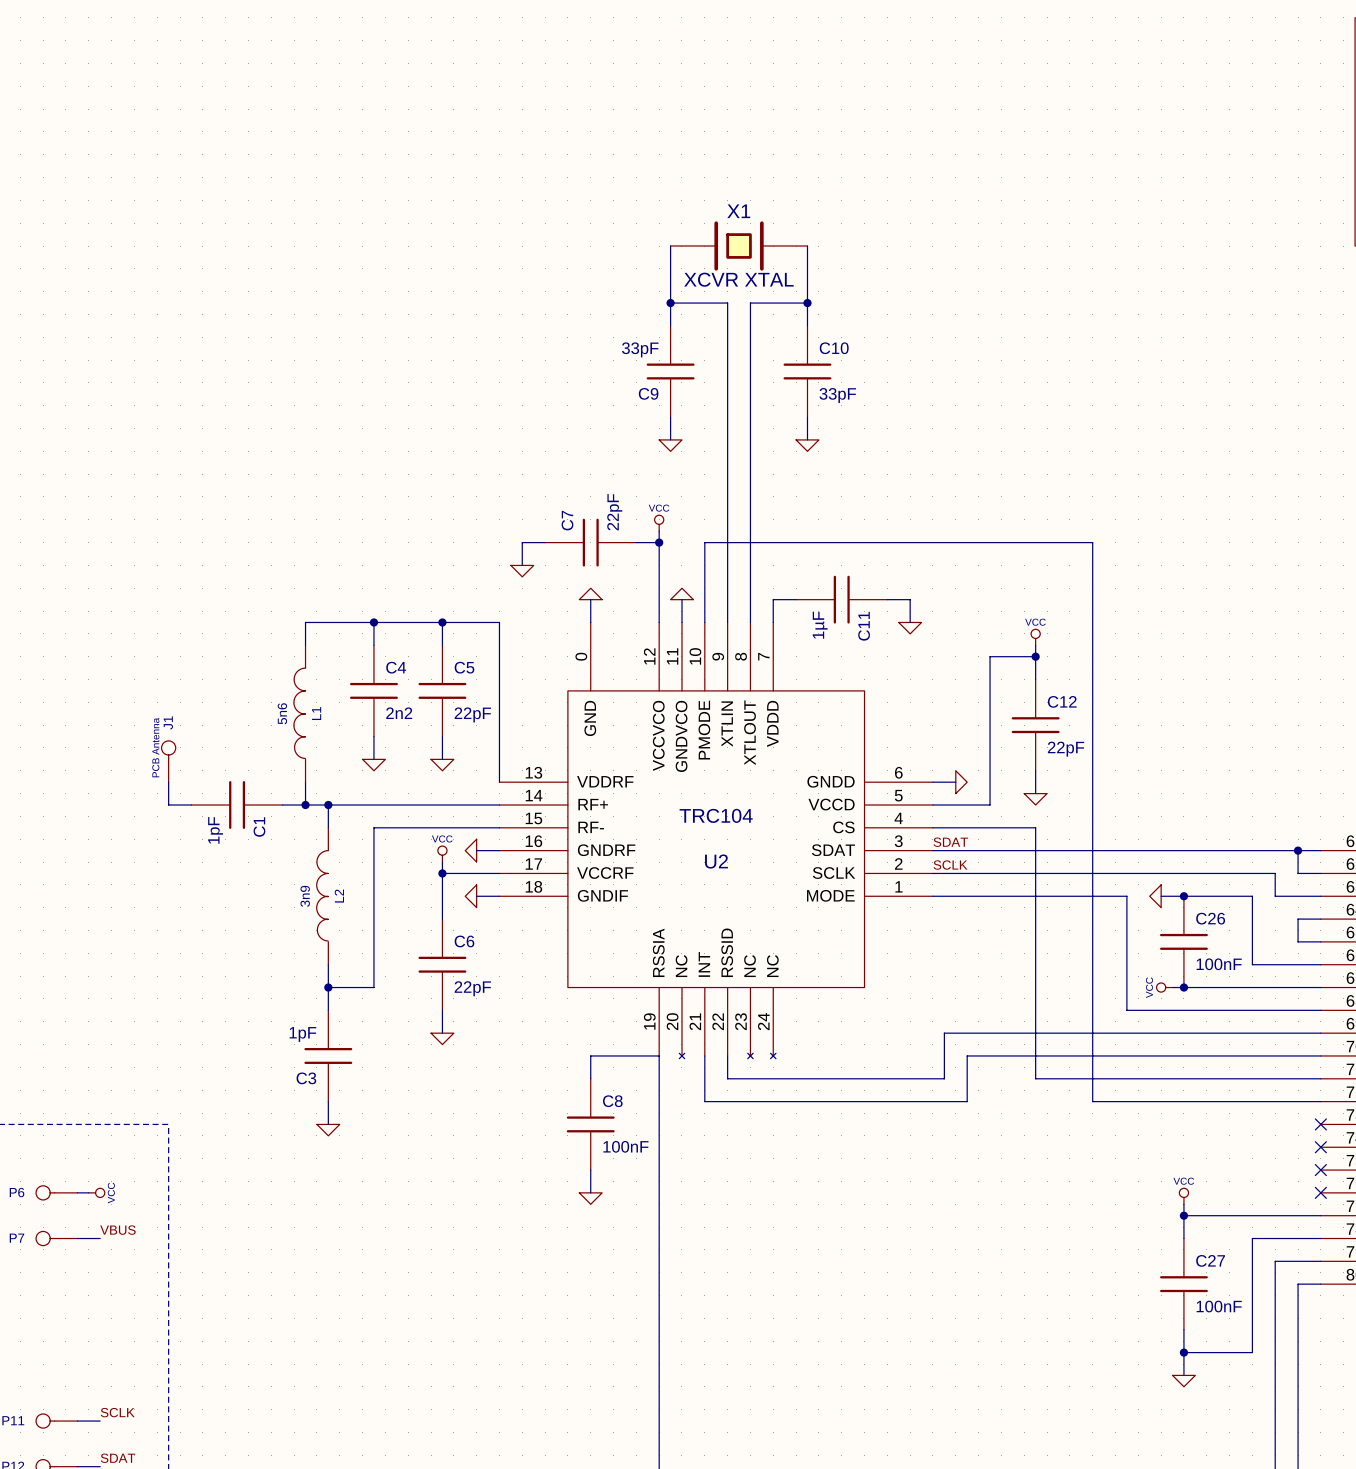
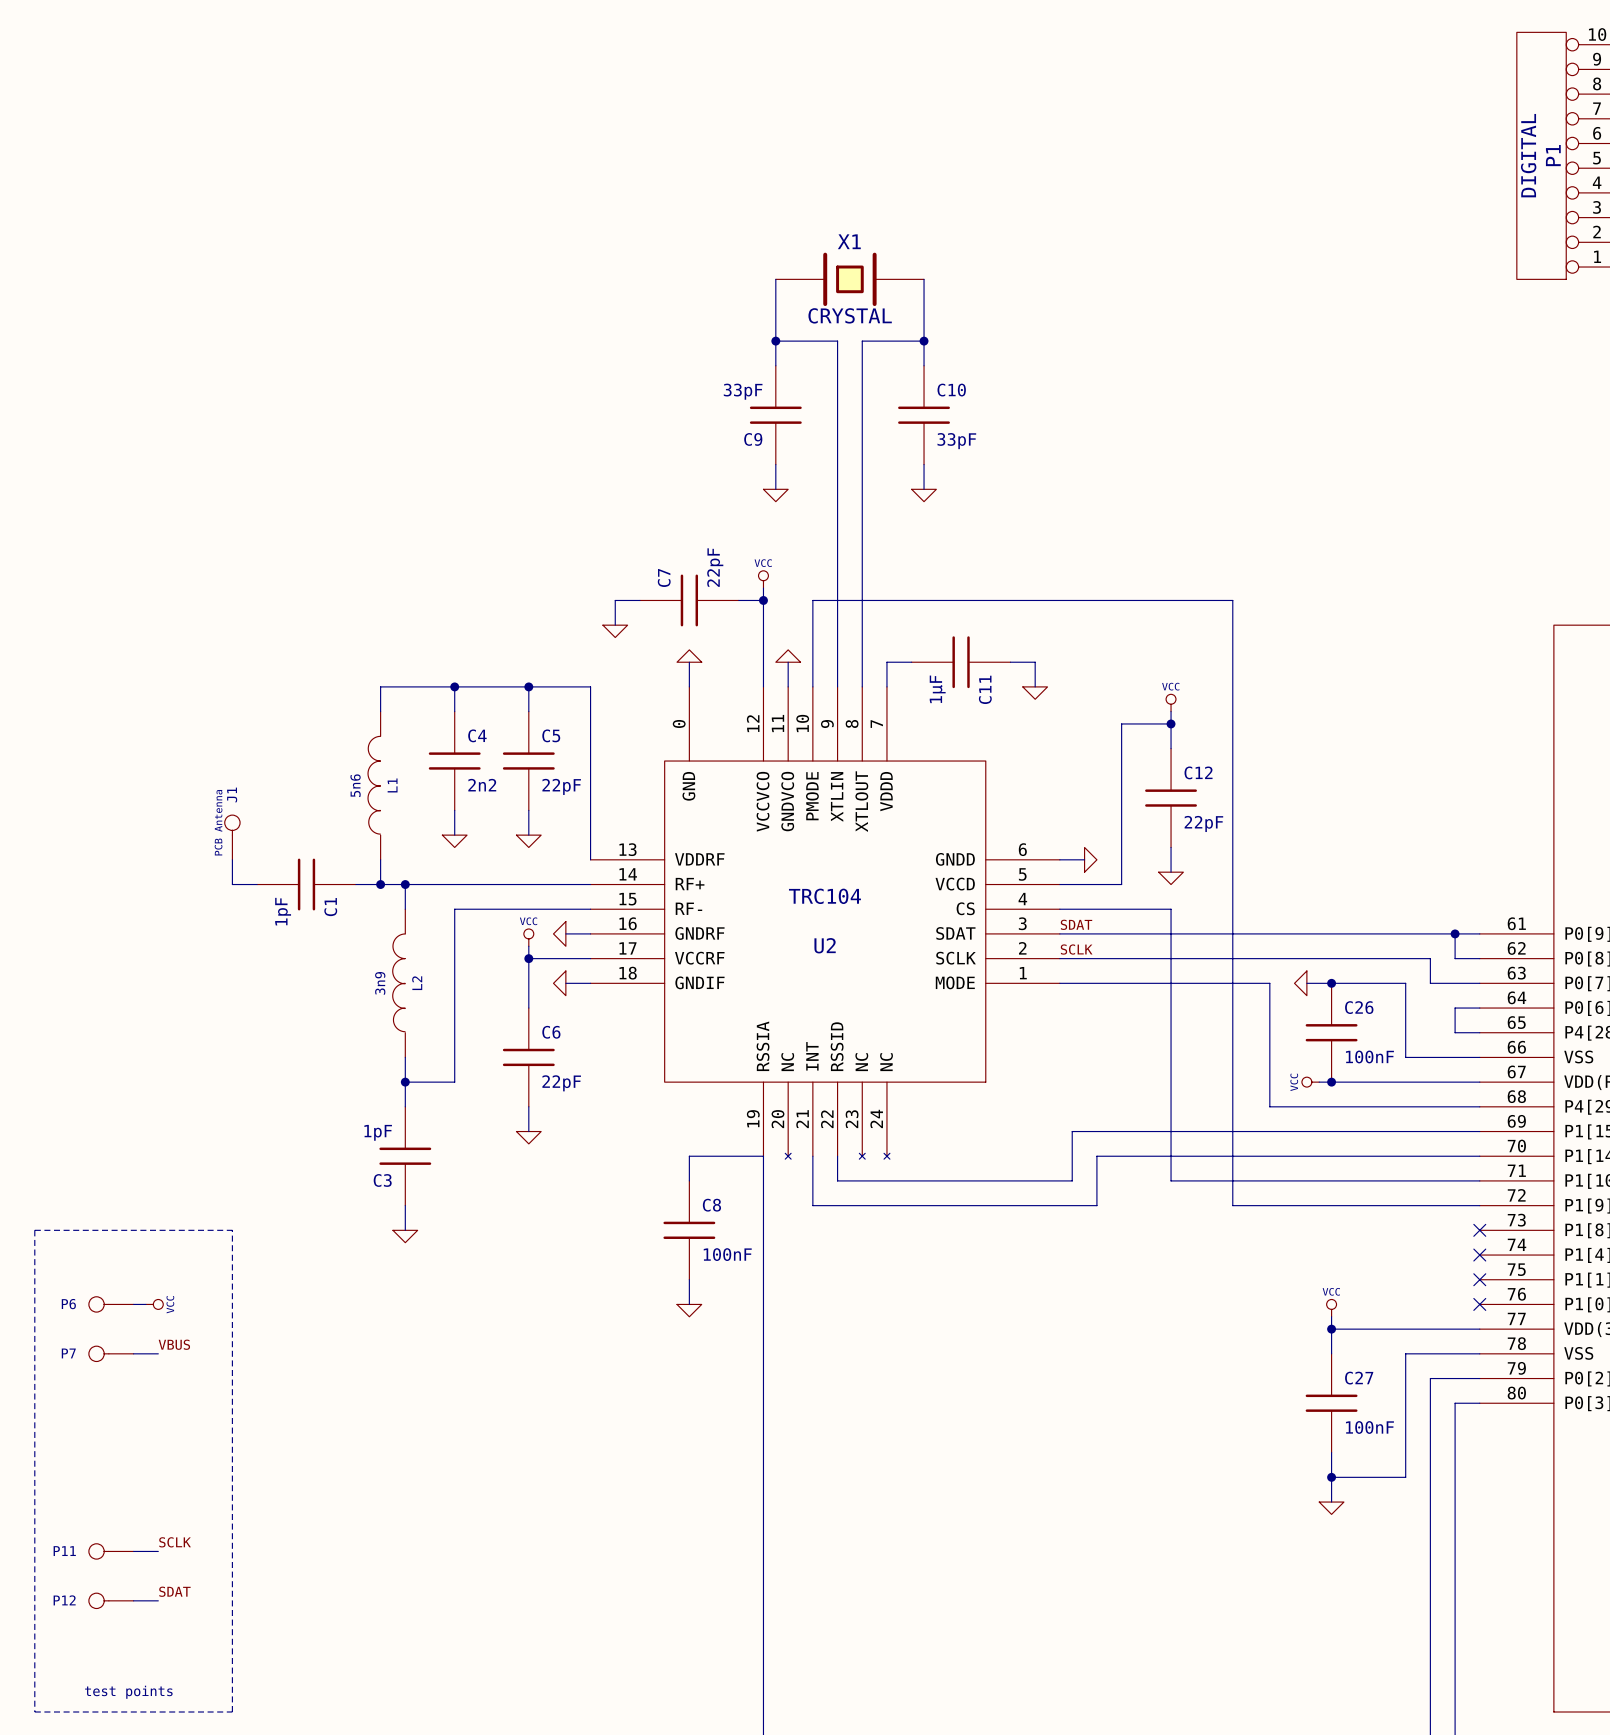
X1 value: XCVR XTAL (738, 279) -> CRYSTAL (850, 315)

